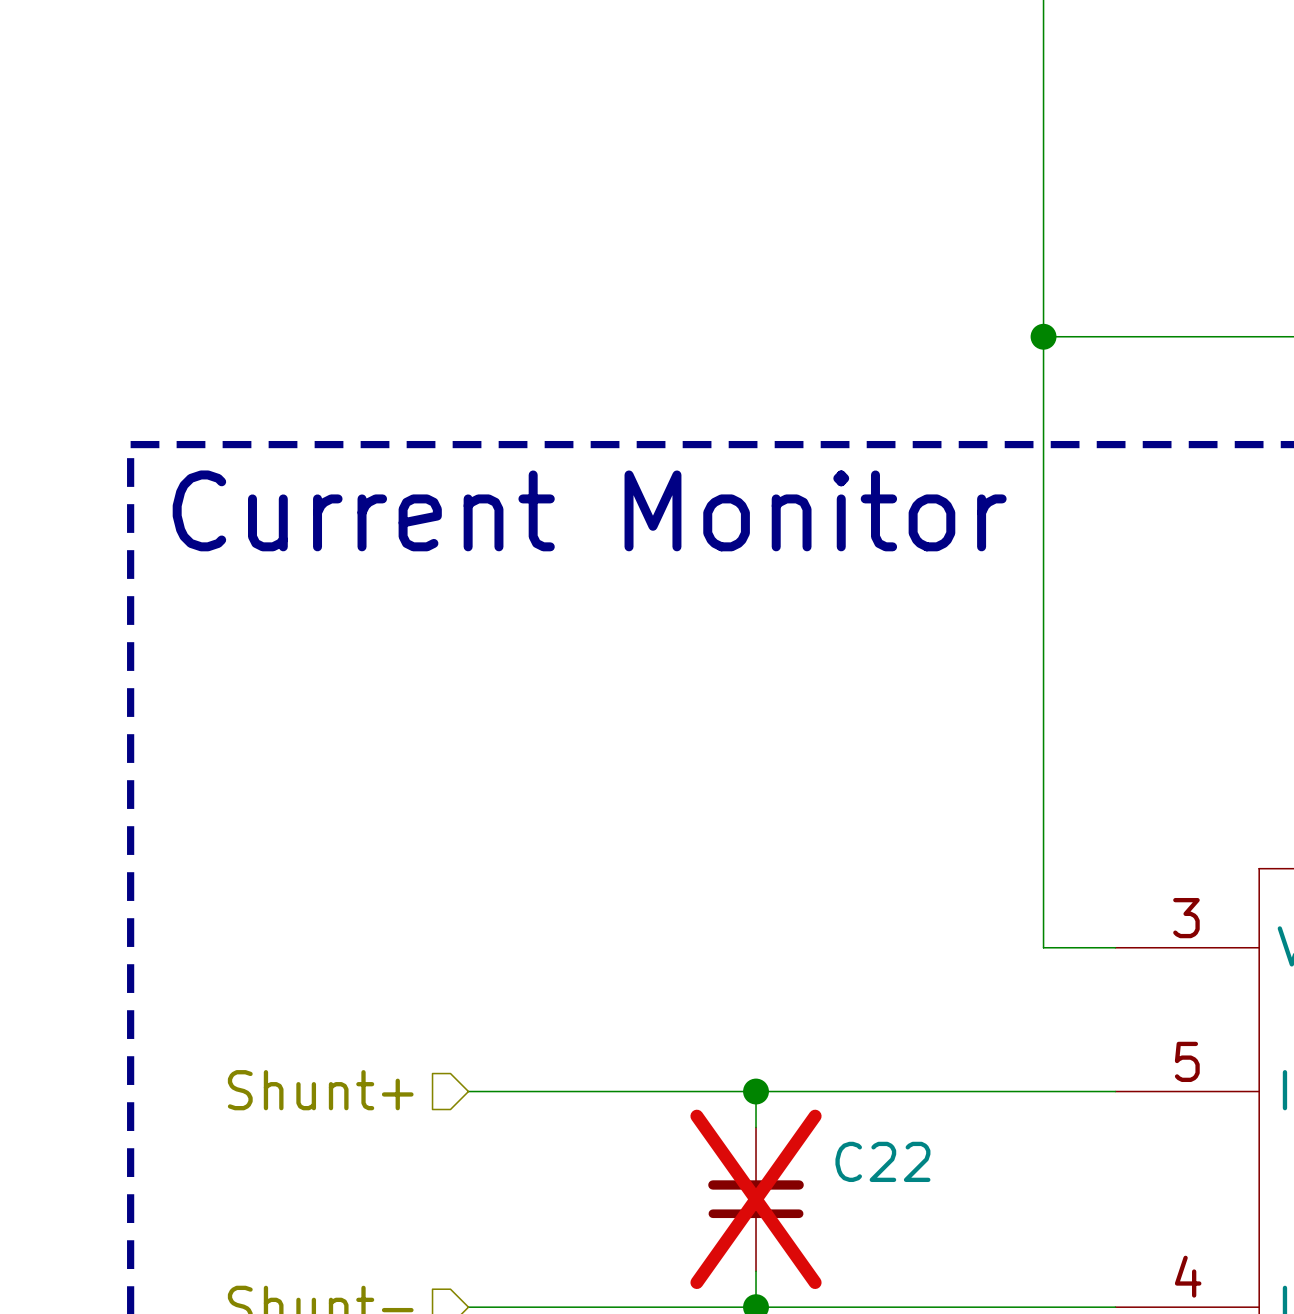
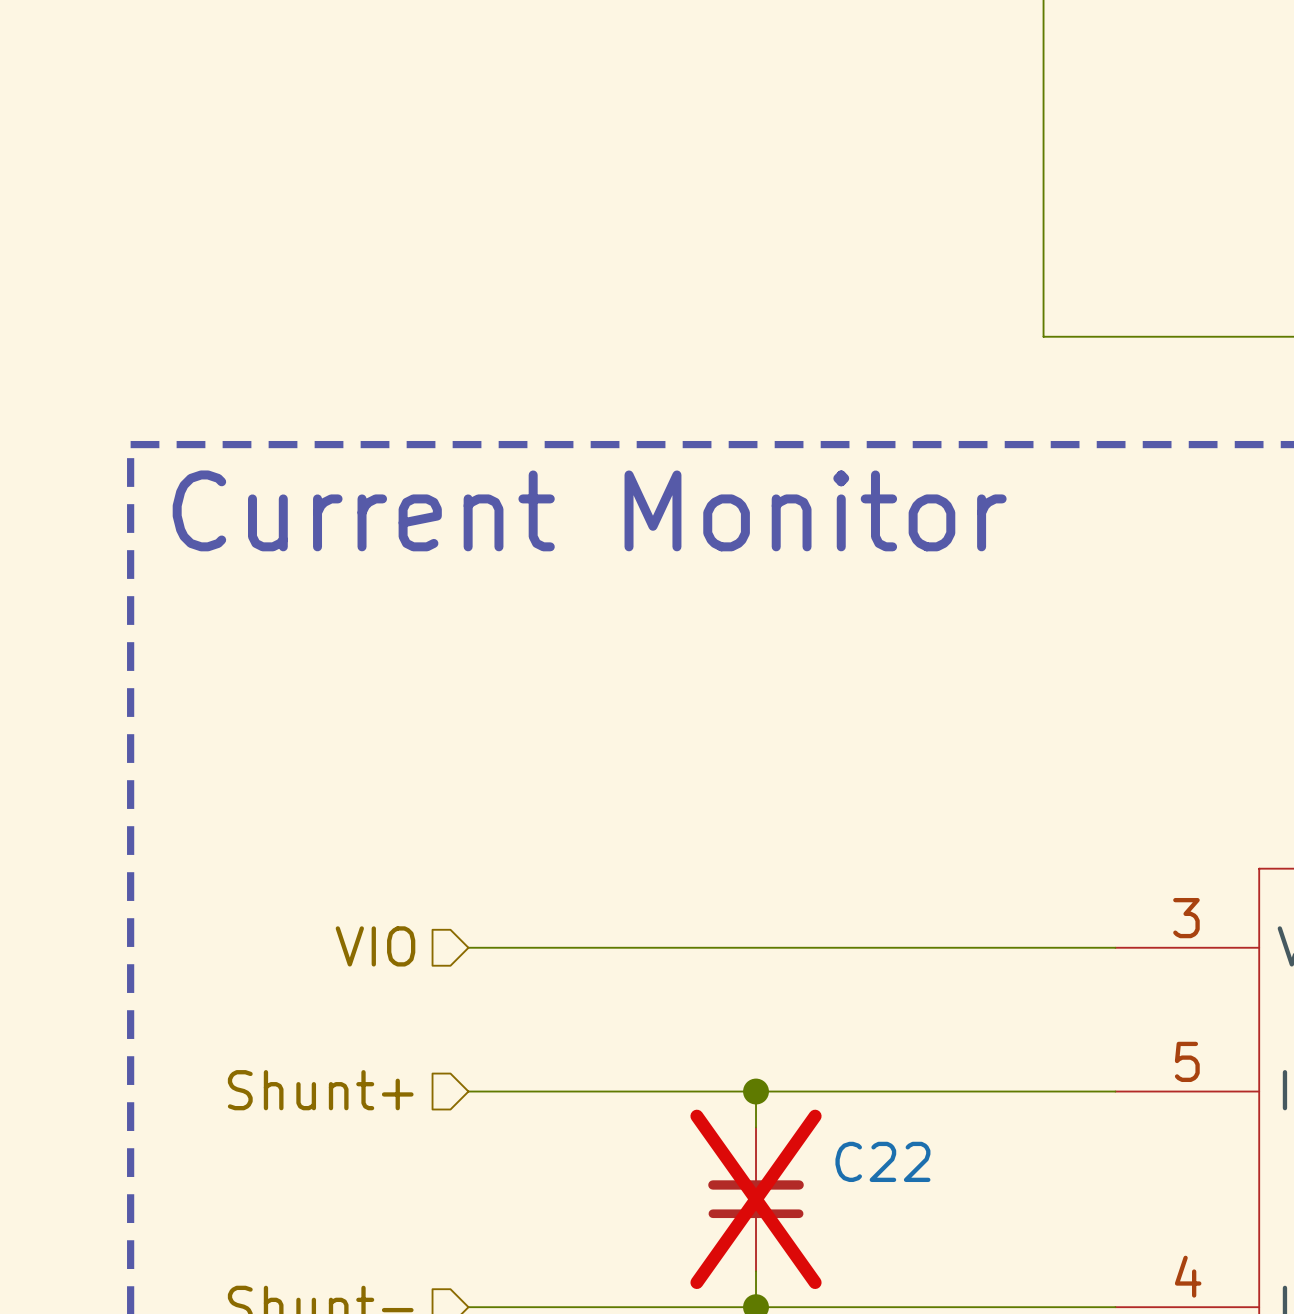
wire: (1043, 336) (1043, 947) -> (468, 947) (1043, 947)
junction: (1043, 336) -> none
hierarchical label: none -> VIO (375, 946)

